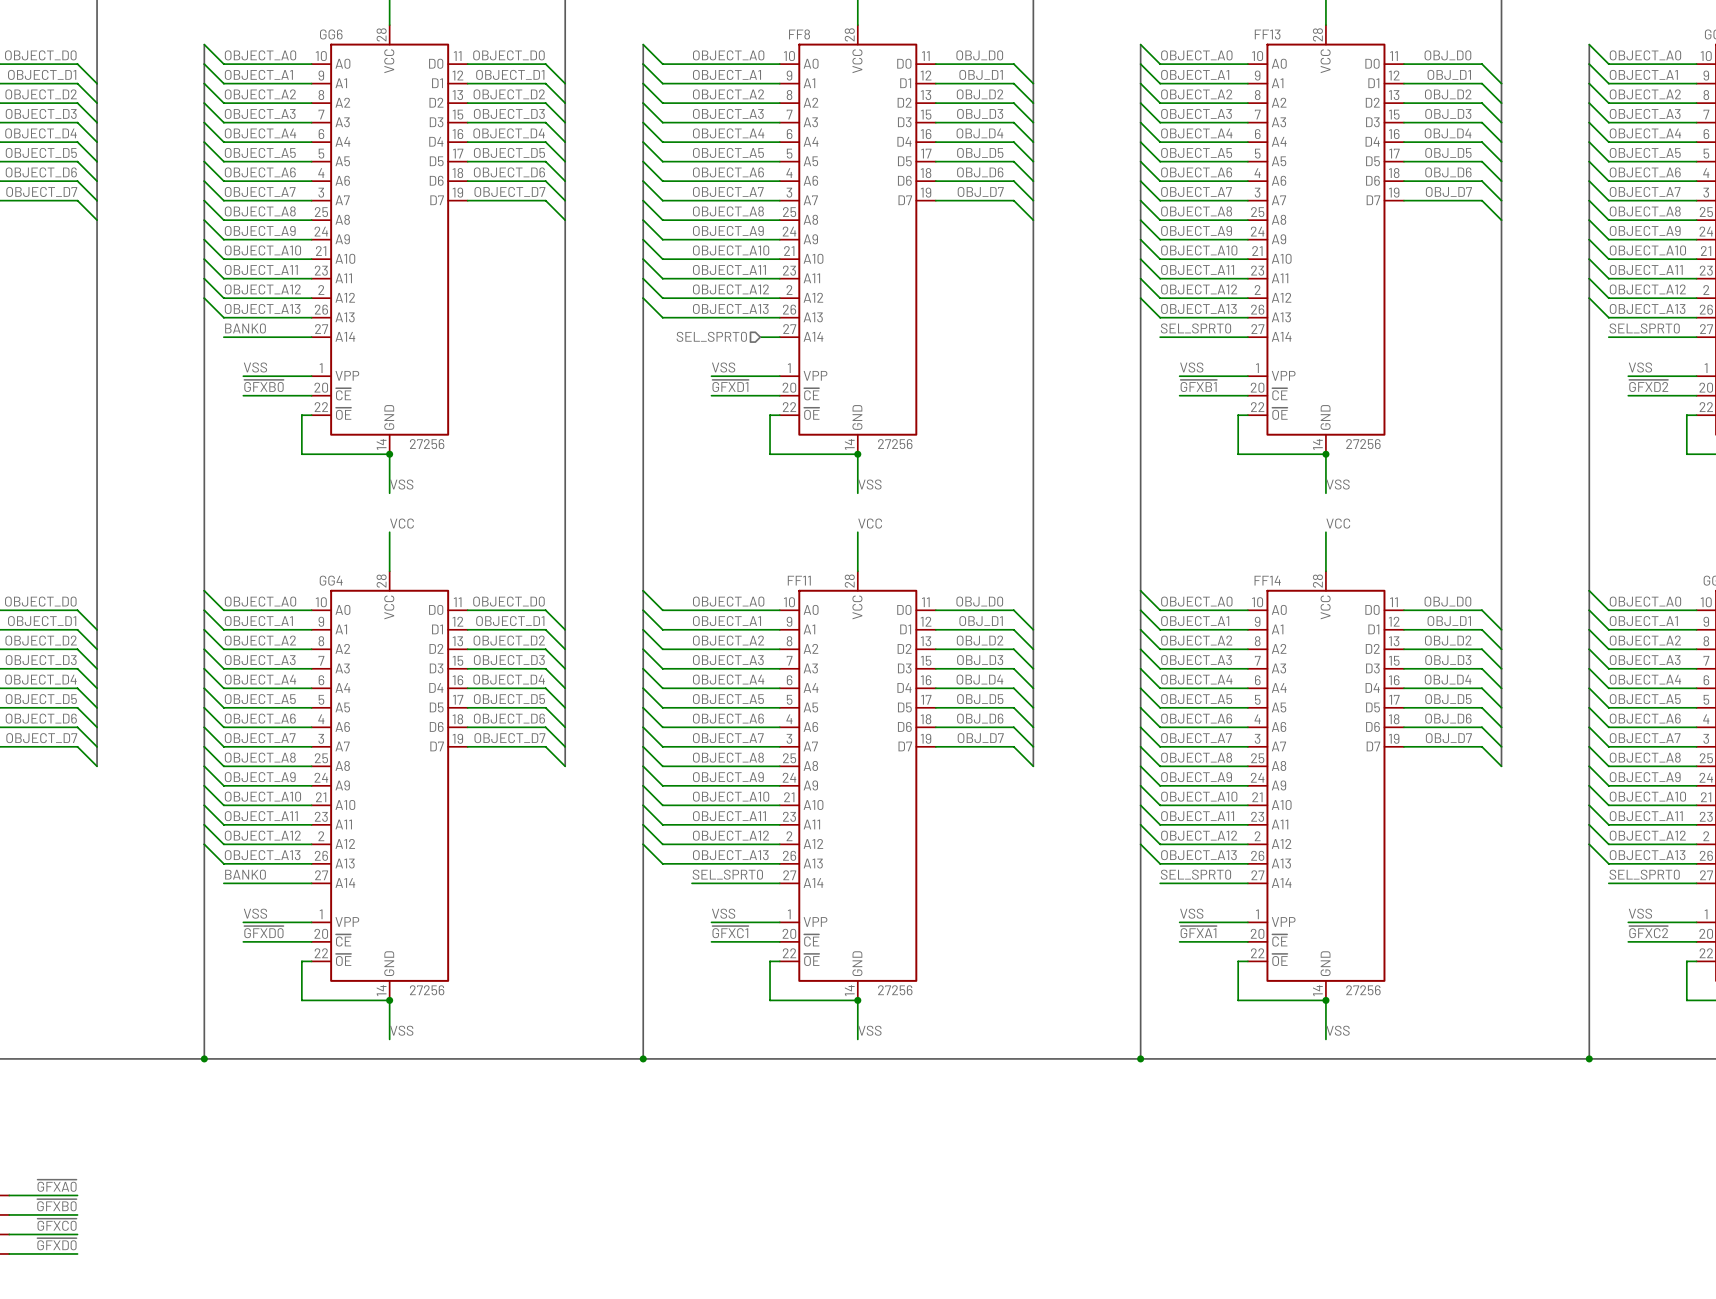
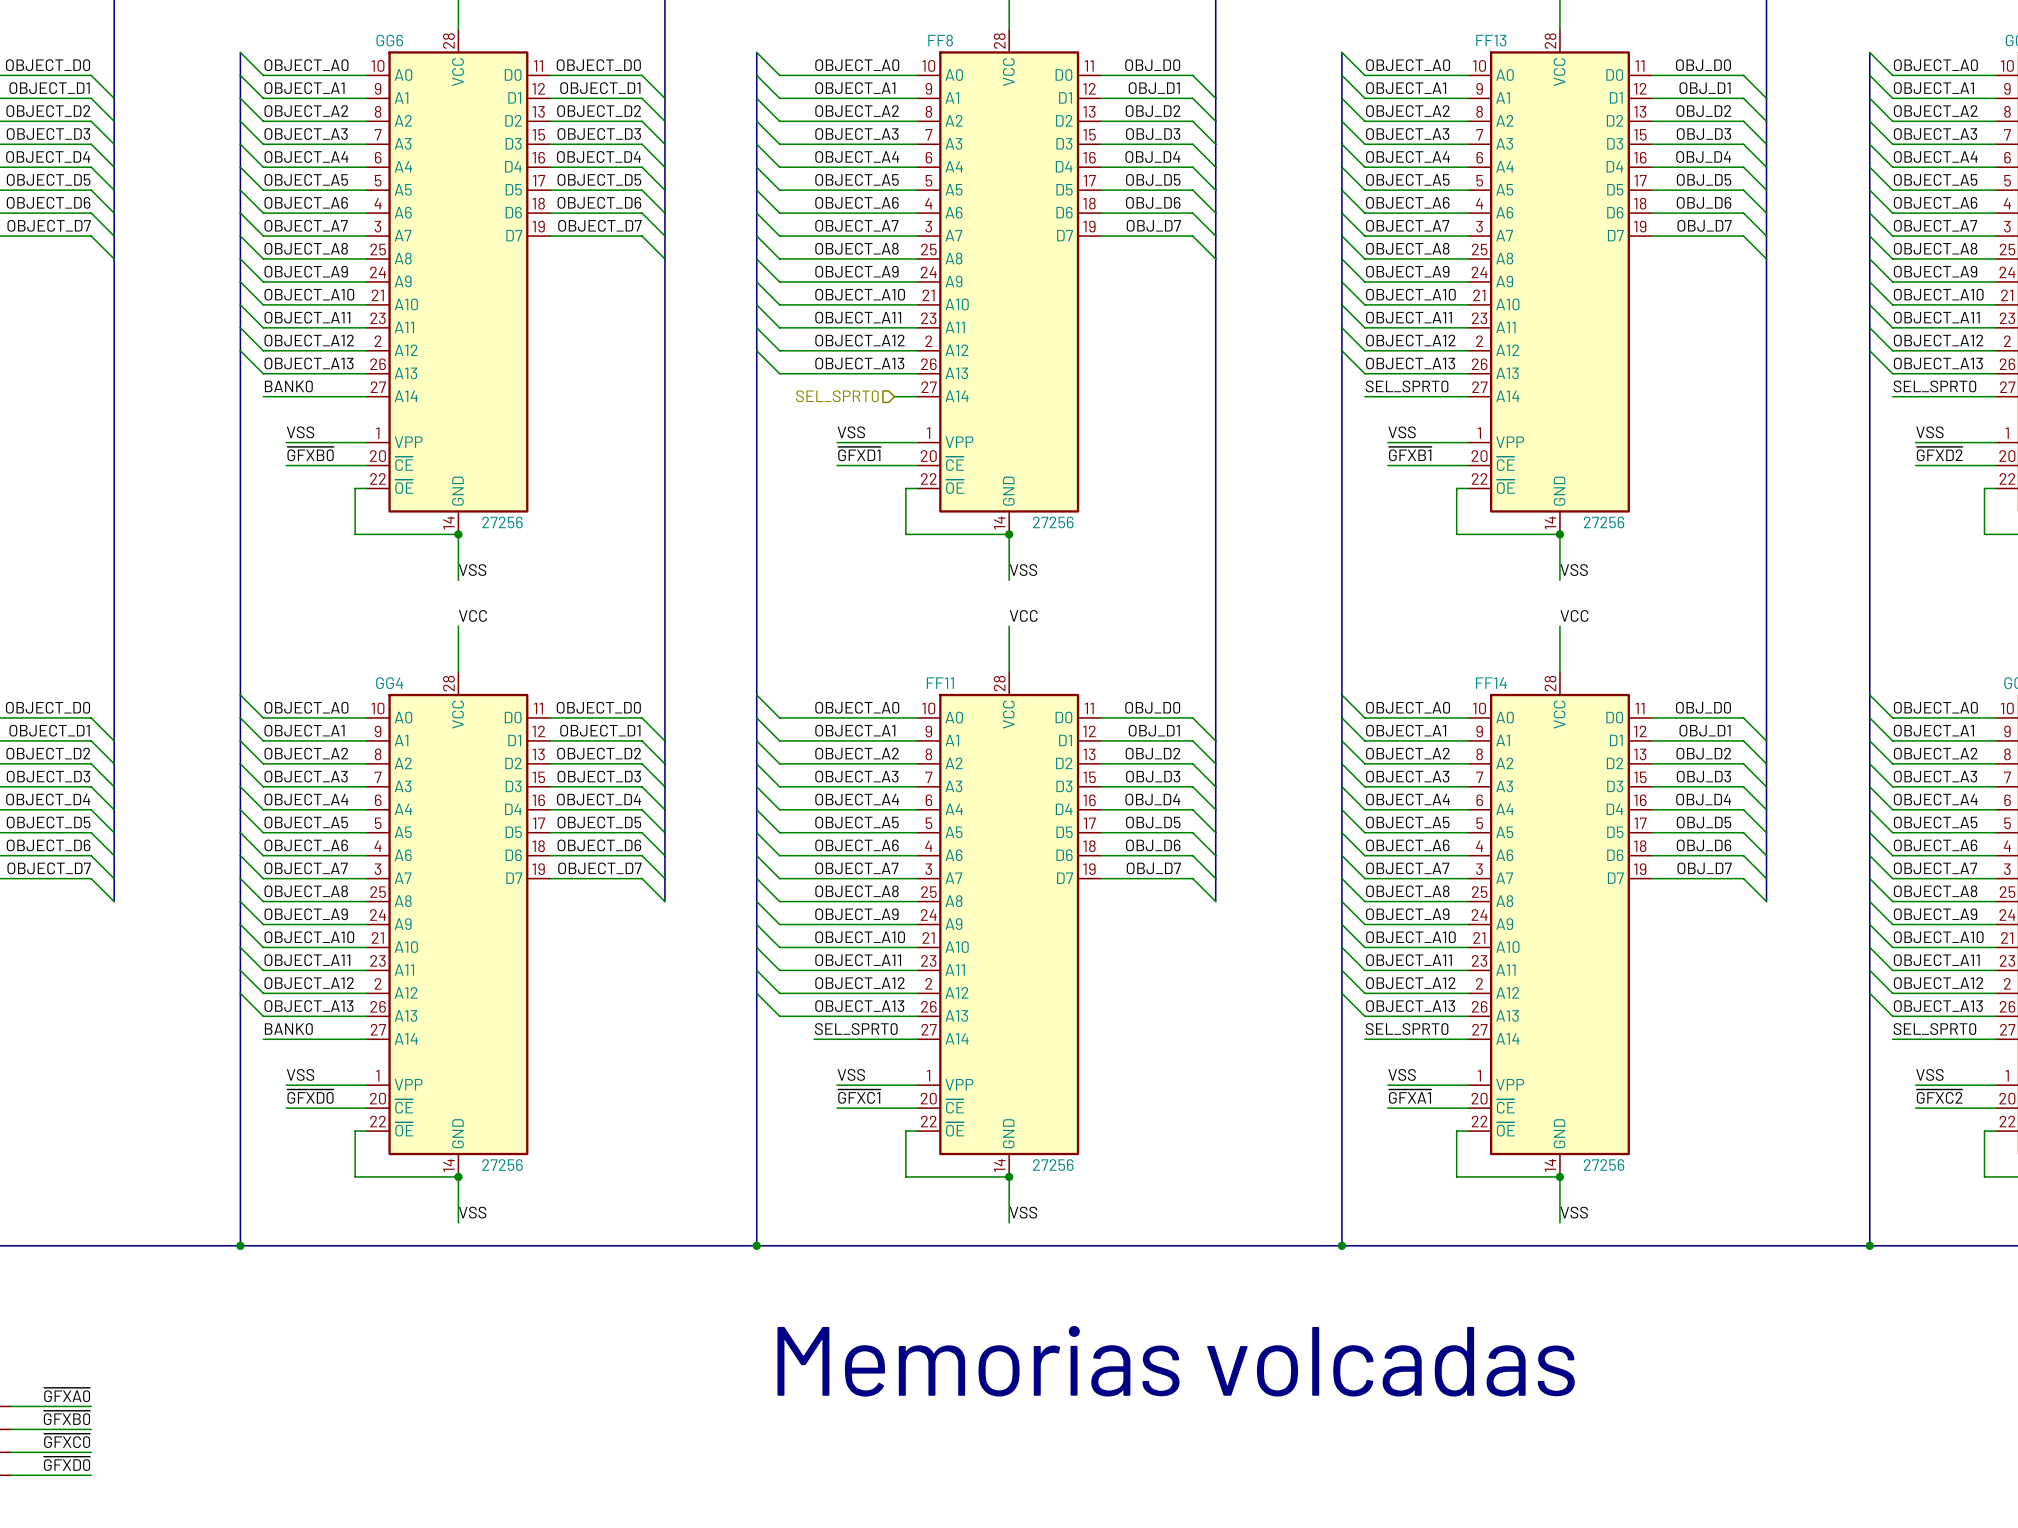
text: none -> Memorias volcadas (1176, 1361)

